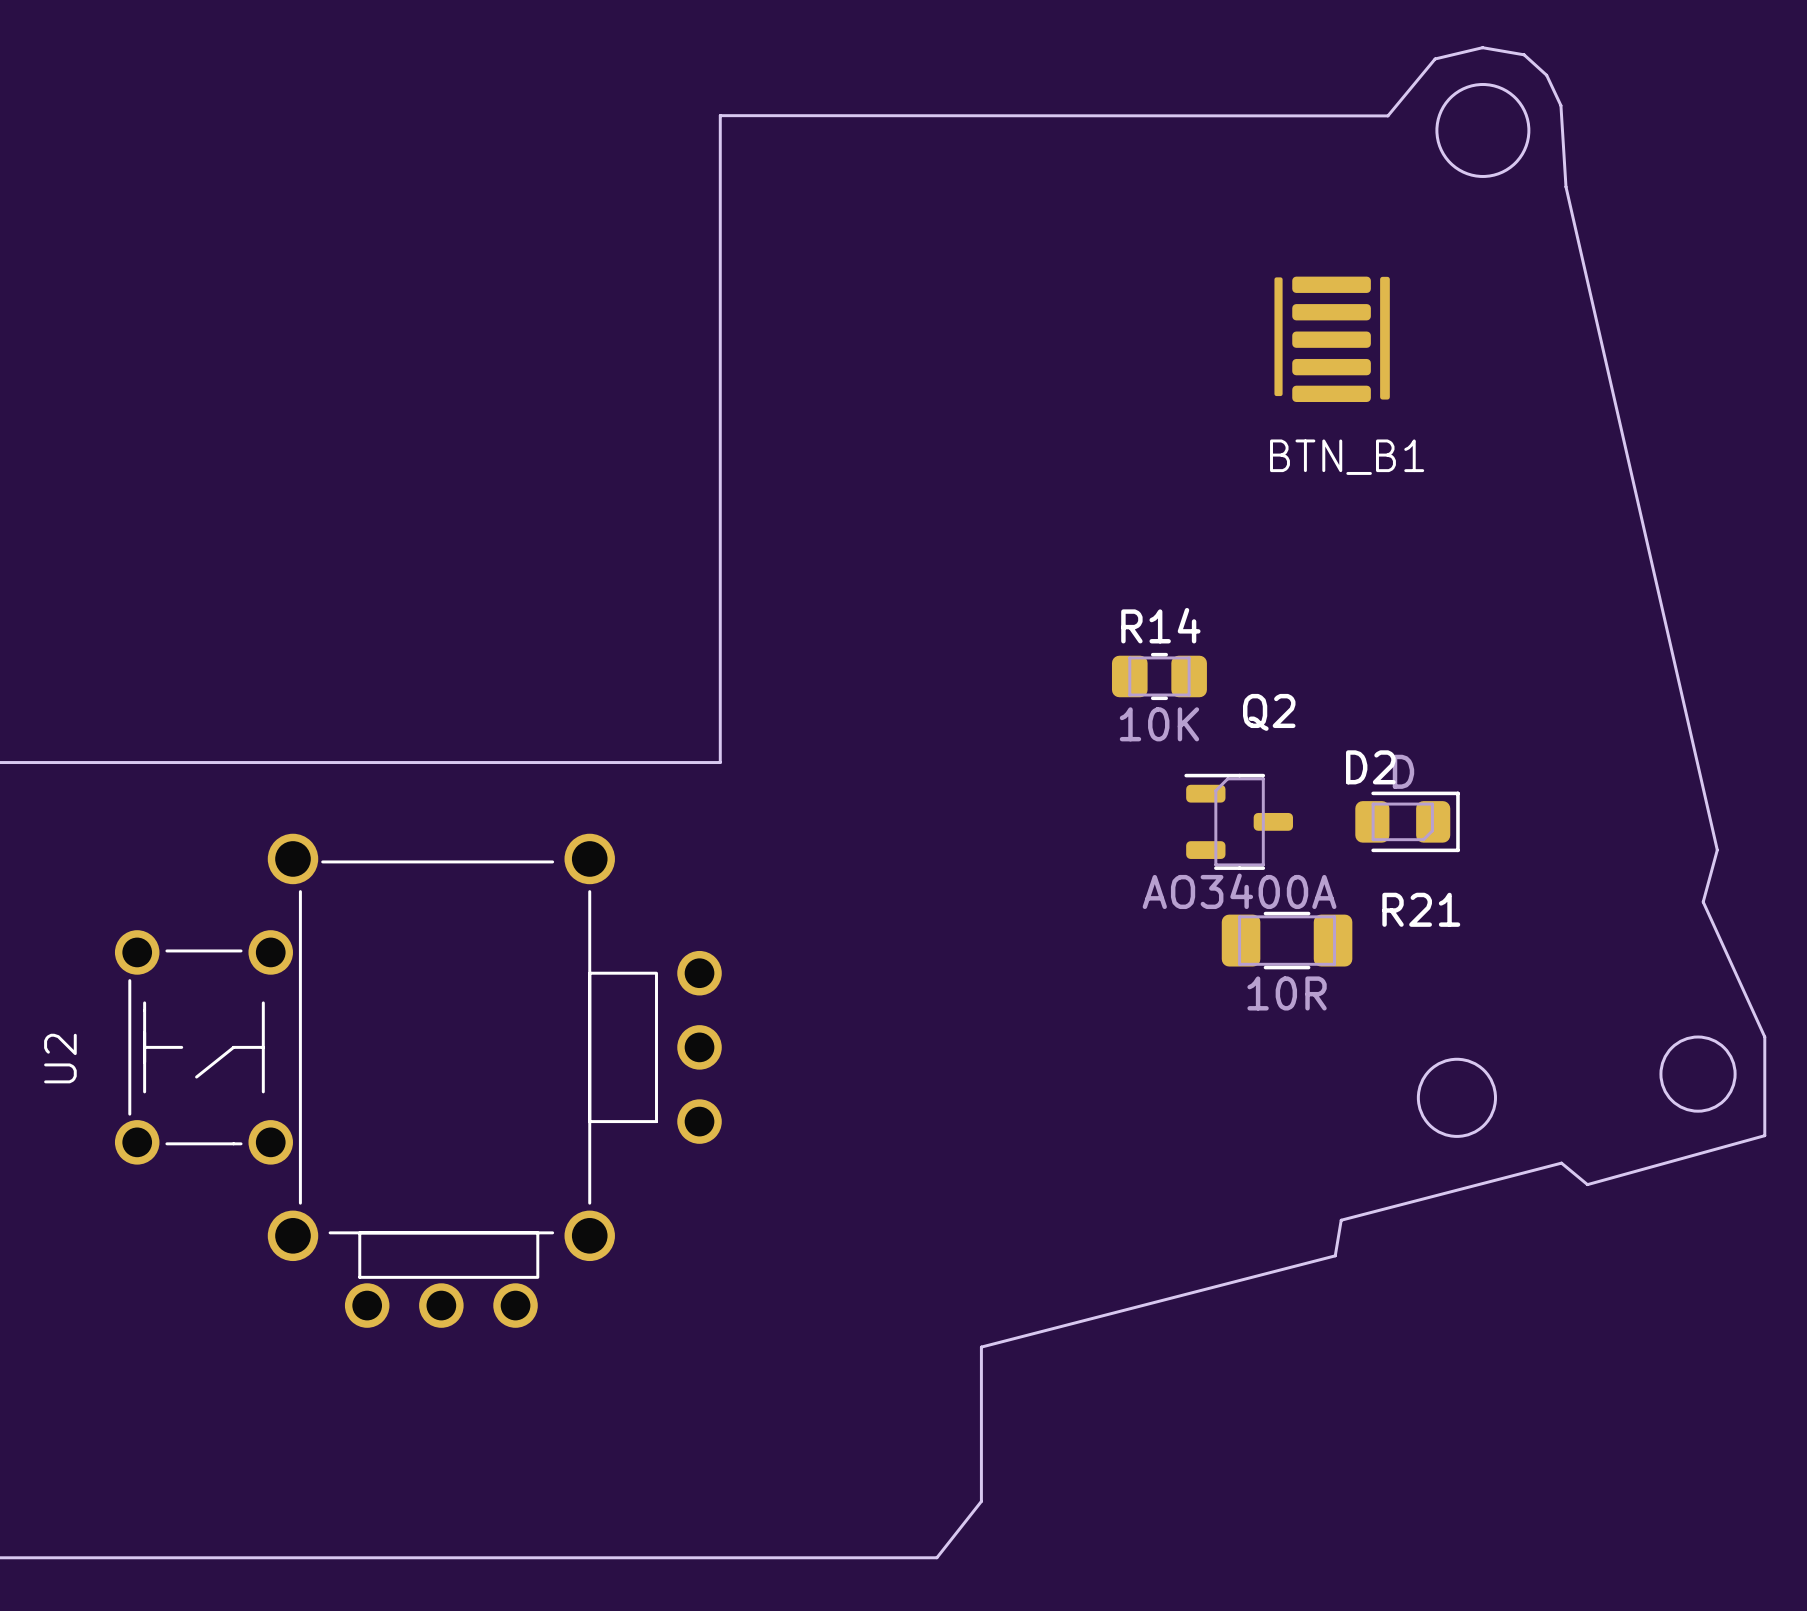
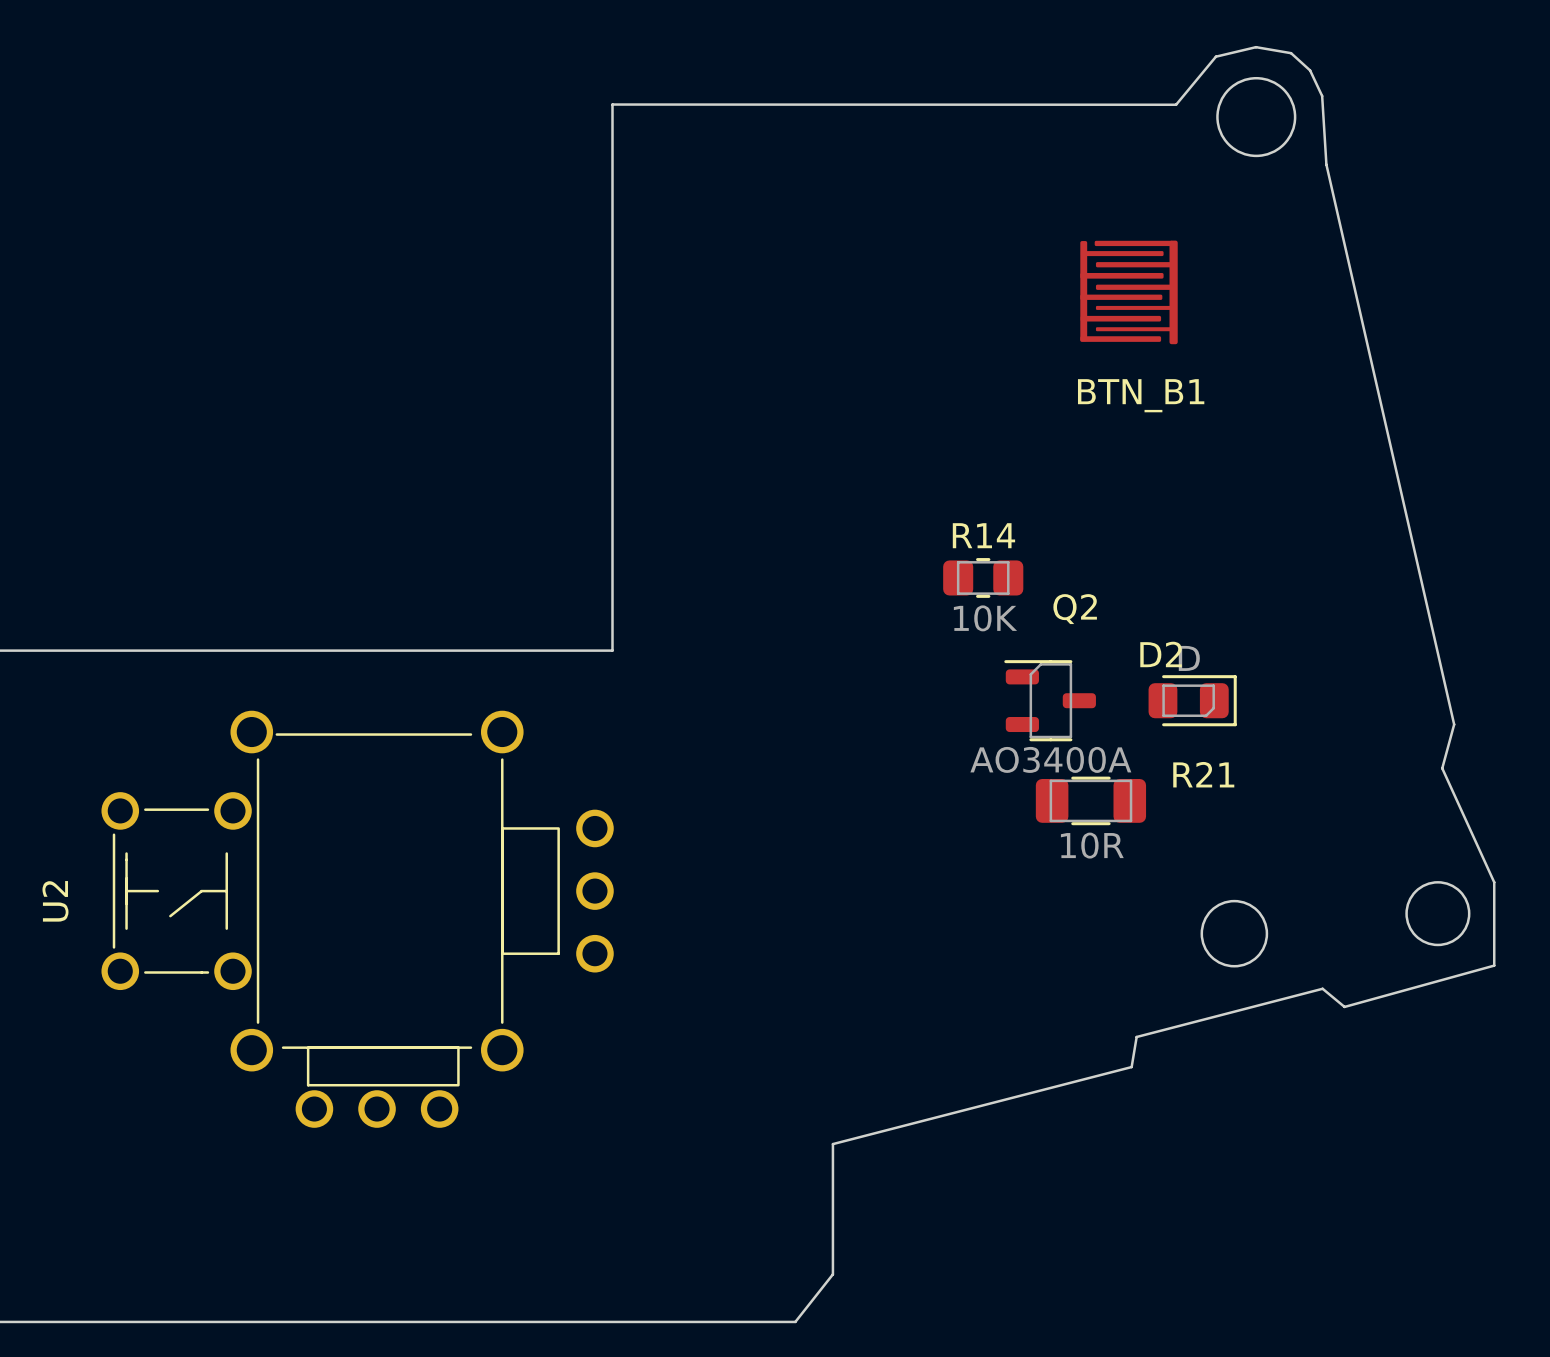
BTN_B1 footprint: [1274, 276, 1390, 403] -> [1080, 240, 1178, 345]

